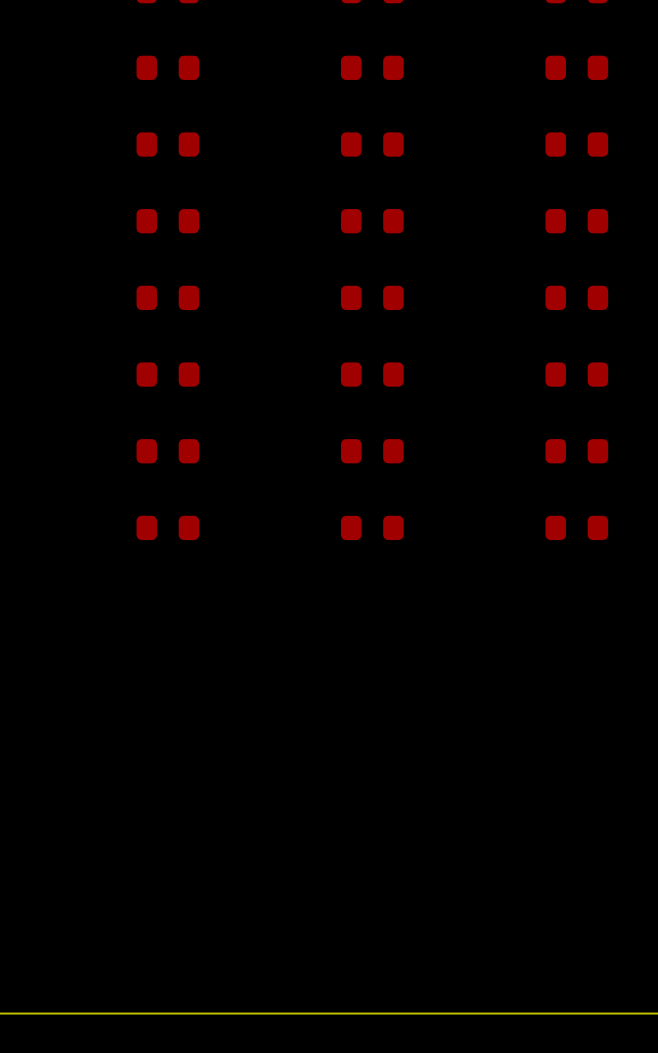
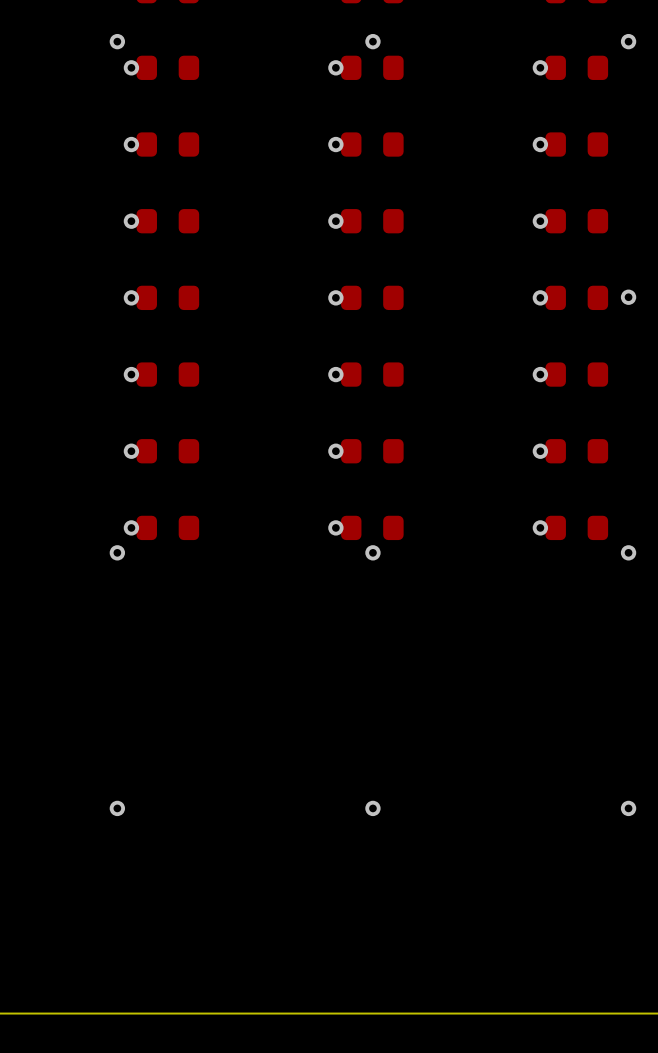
via: none -> (117, 41)
via: none -> (372, 41)
via: none -> (628, 41)
via: none -> (131, 67)
via: none -> (335, 67)
via: none -> (540, 67)
via: none -> (131, 144)
via: none -> (335, 144)
via: none -> (540, 144)
via: none -> (131, 221)
via: none -> (335, 221)
via: none -> (540, 221)
via: none -> (131, 297)
via: none -> (335, 297)
via: none -> (540, 297)
via: none -> (628, 297)
via: none -> (131, 374)
via: none -> (335, 374)
via: none -> (540, 374)
via: none -> (131, 451)
via: none -> (335, 451)
via: none -> (540, 451)
via: none -> (131, 527)
via: none -> (335, 527)
via: none -> (540, 527)
via: none -> (117, 552)
via: none -> (372, 552)
via: none -> (628, 552)
via: none -> (117, 808)
via: none -> (372, 808)
via: none -> (628, 808)

